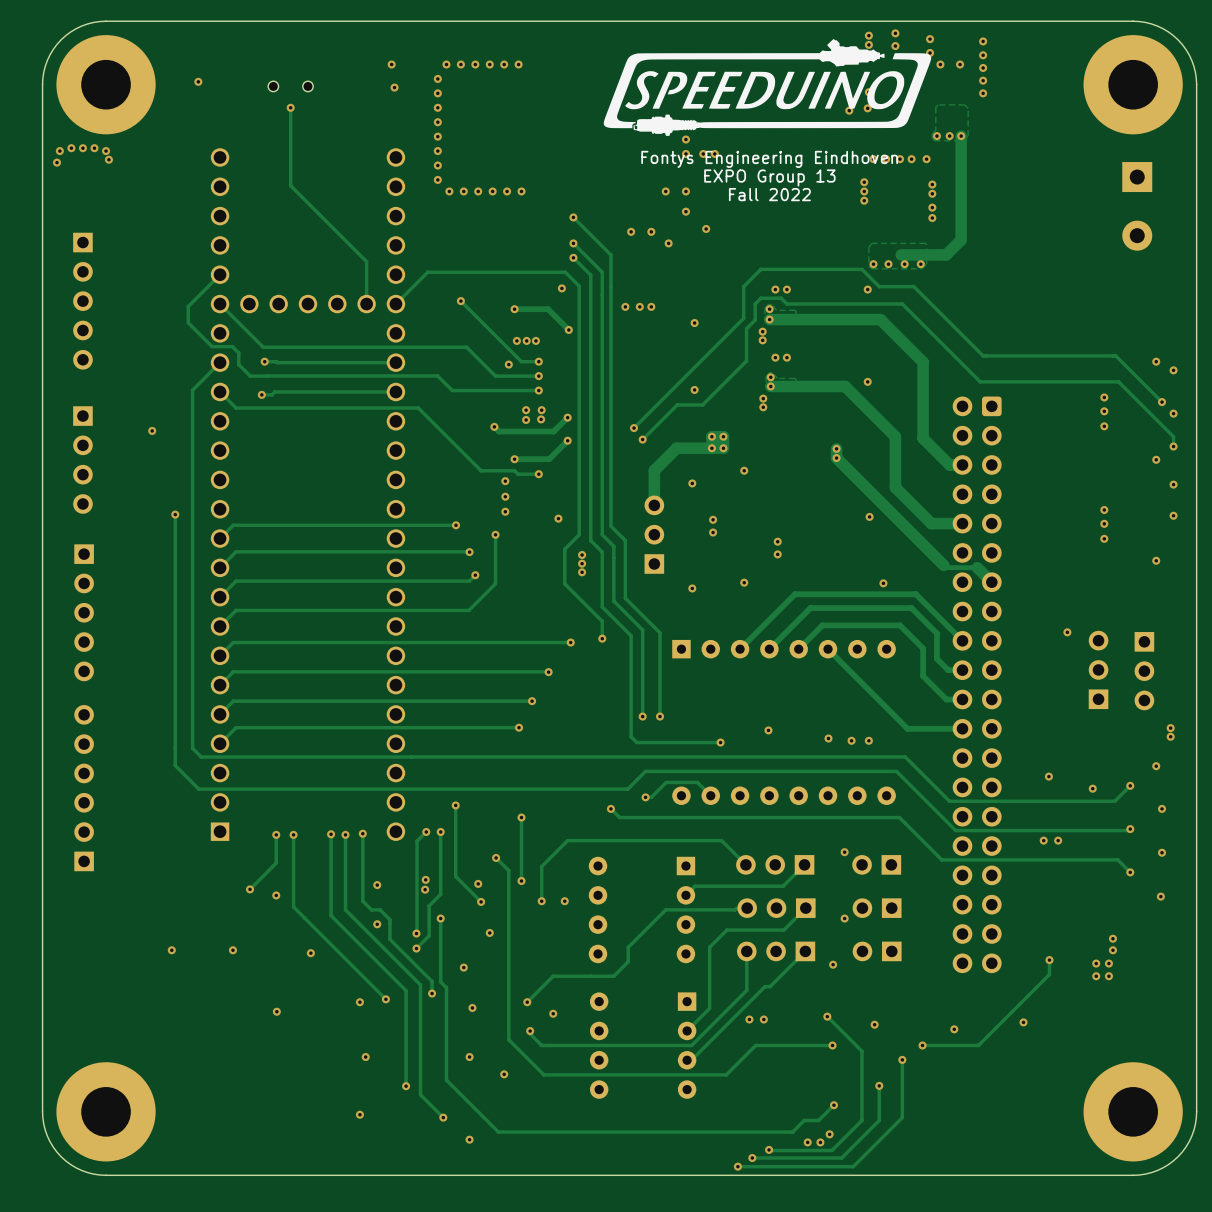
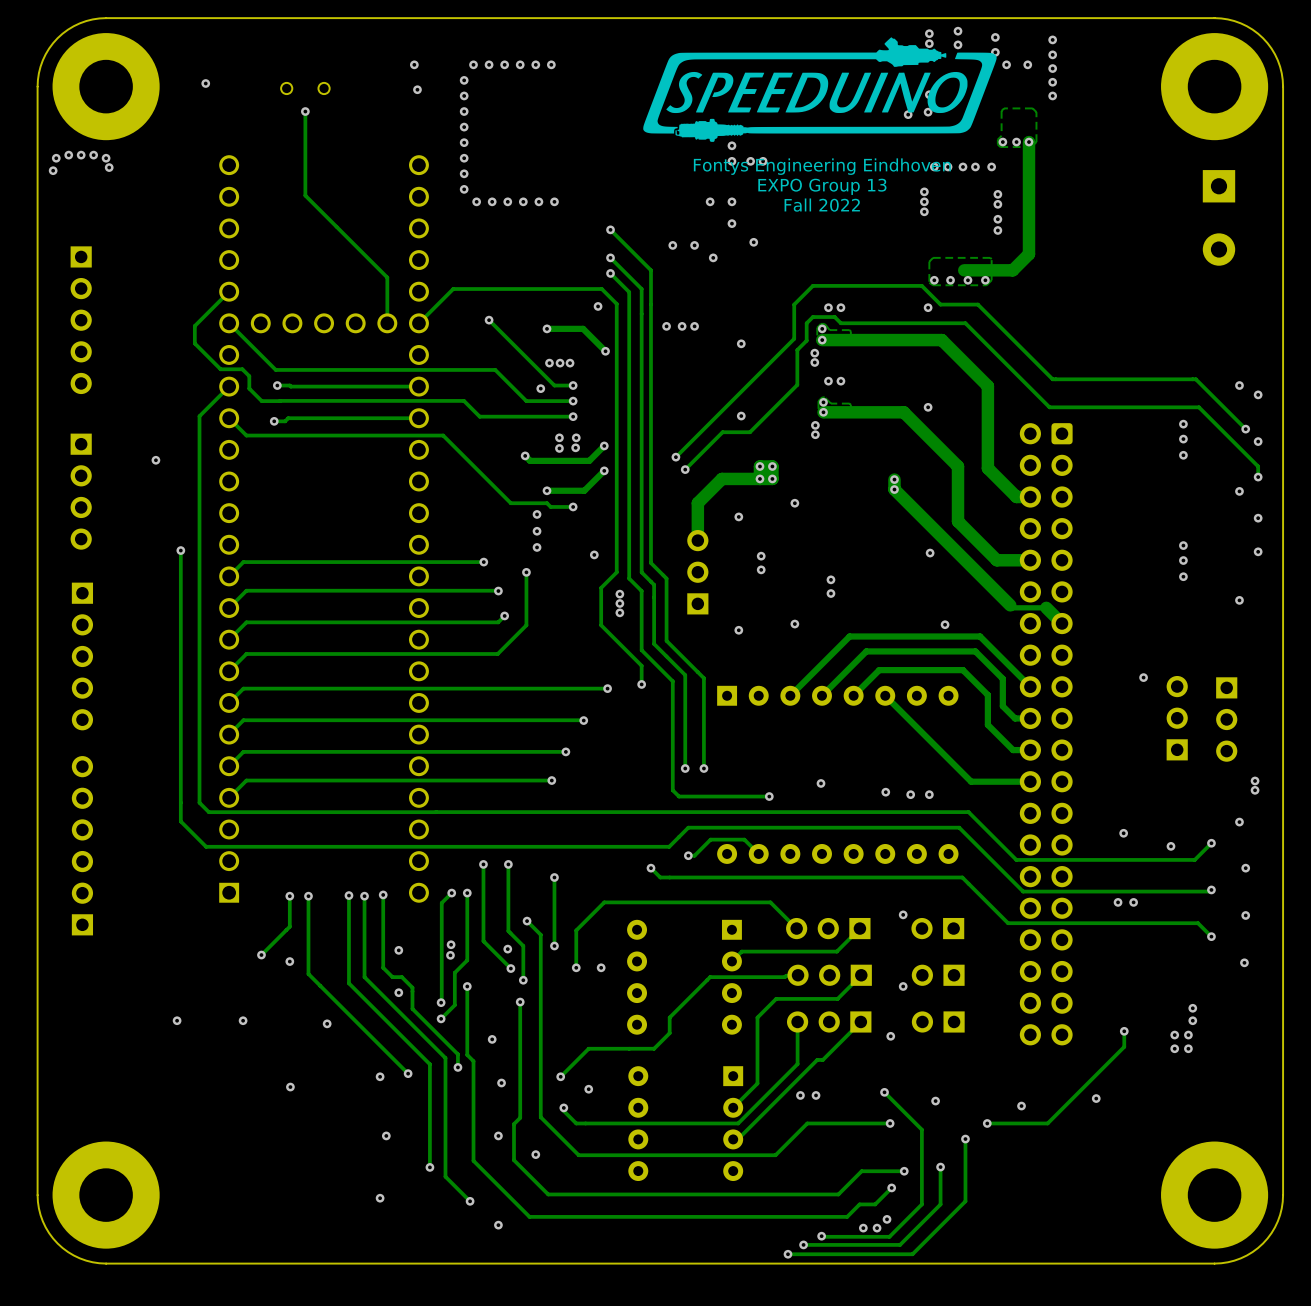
track: none -> (508, 864) (508, 931) (523, 946) (523, 980)
via: none -> (508, 864)
via: none -> (523, 980)
track: none -> (520, 1002) (520, 1117) (513, 1124) (513, 1160) (548, 1194) (838, 1194) (861, 1171) (904, 1171)
via: none -> (904, 1171)

